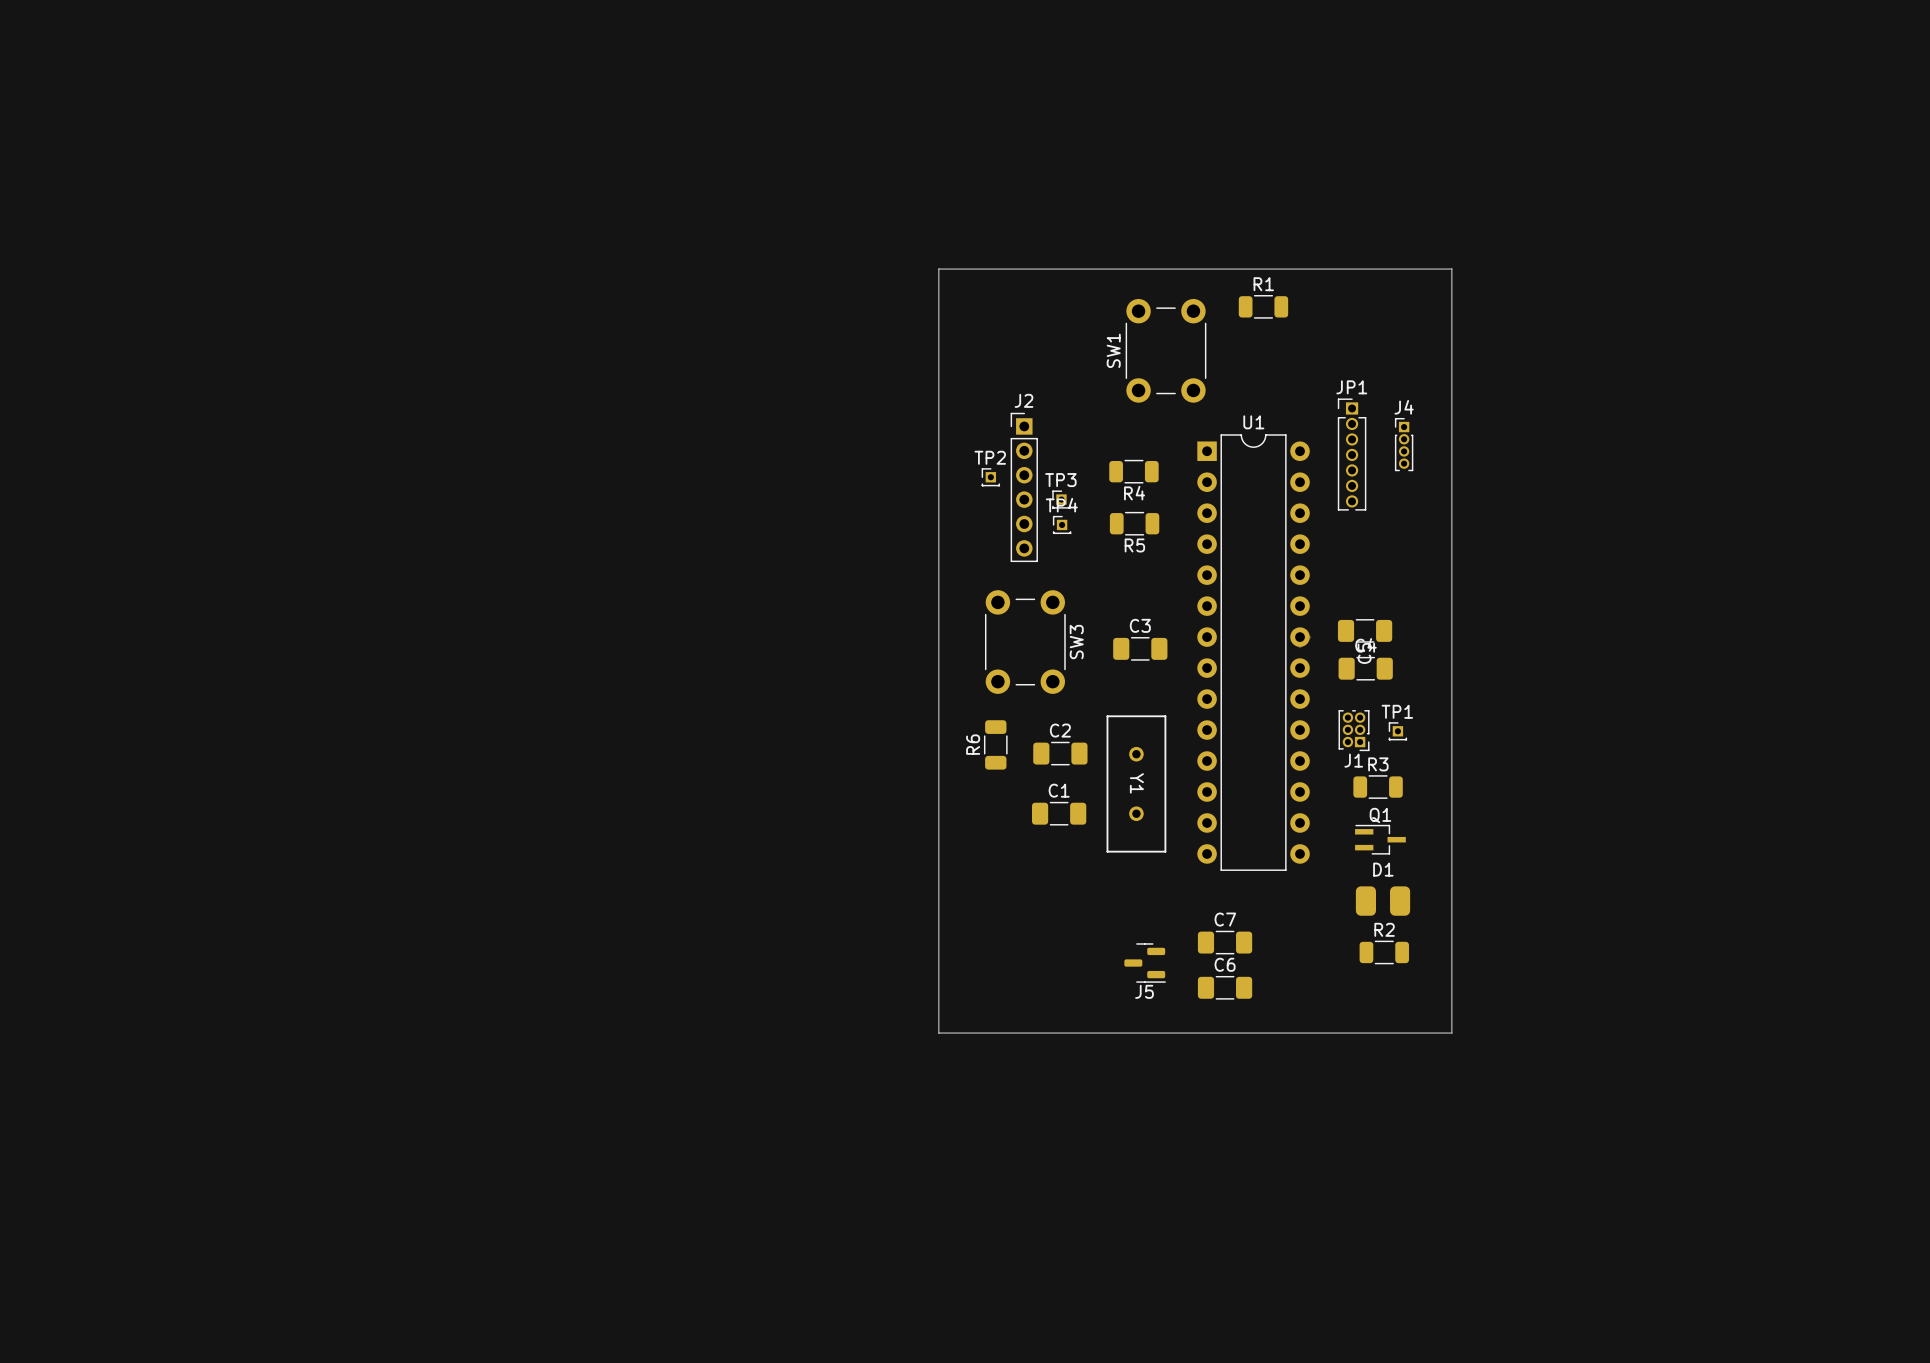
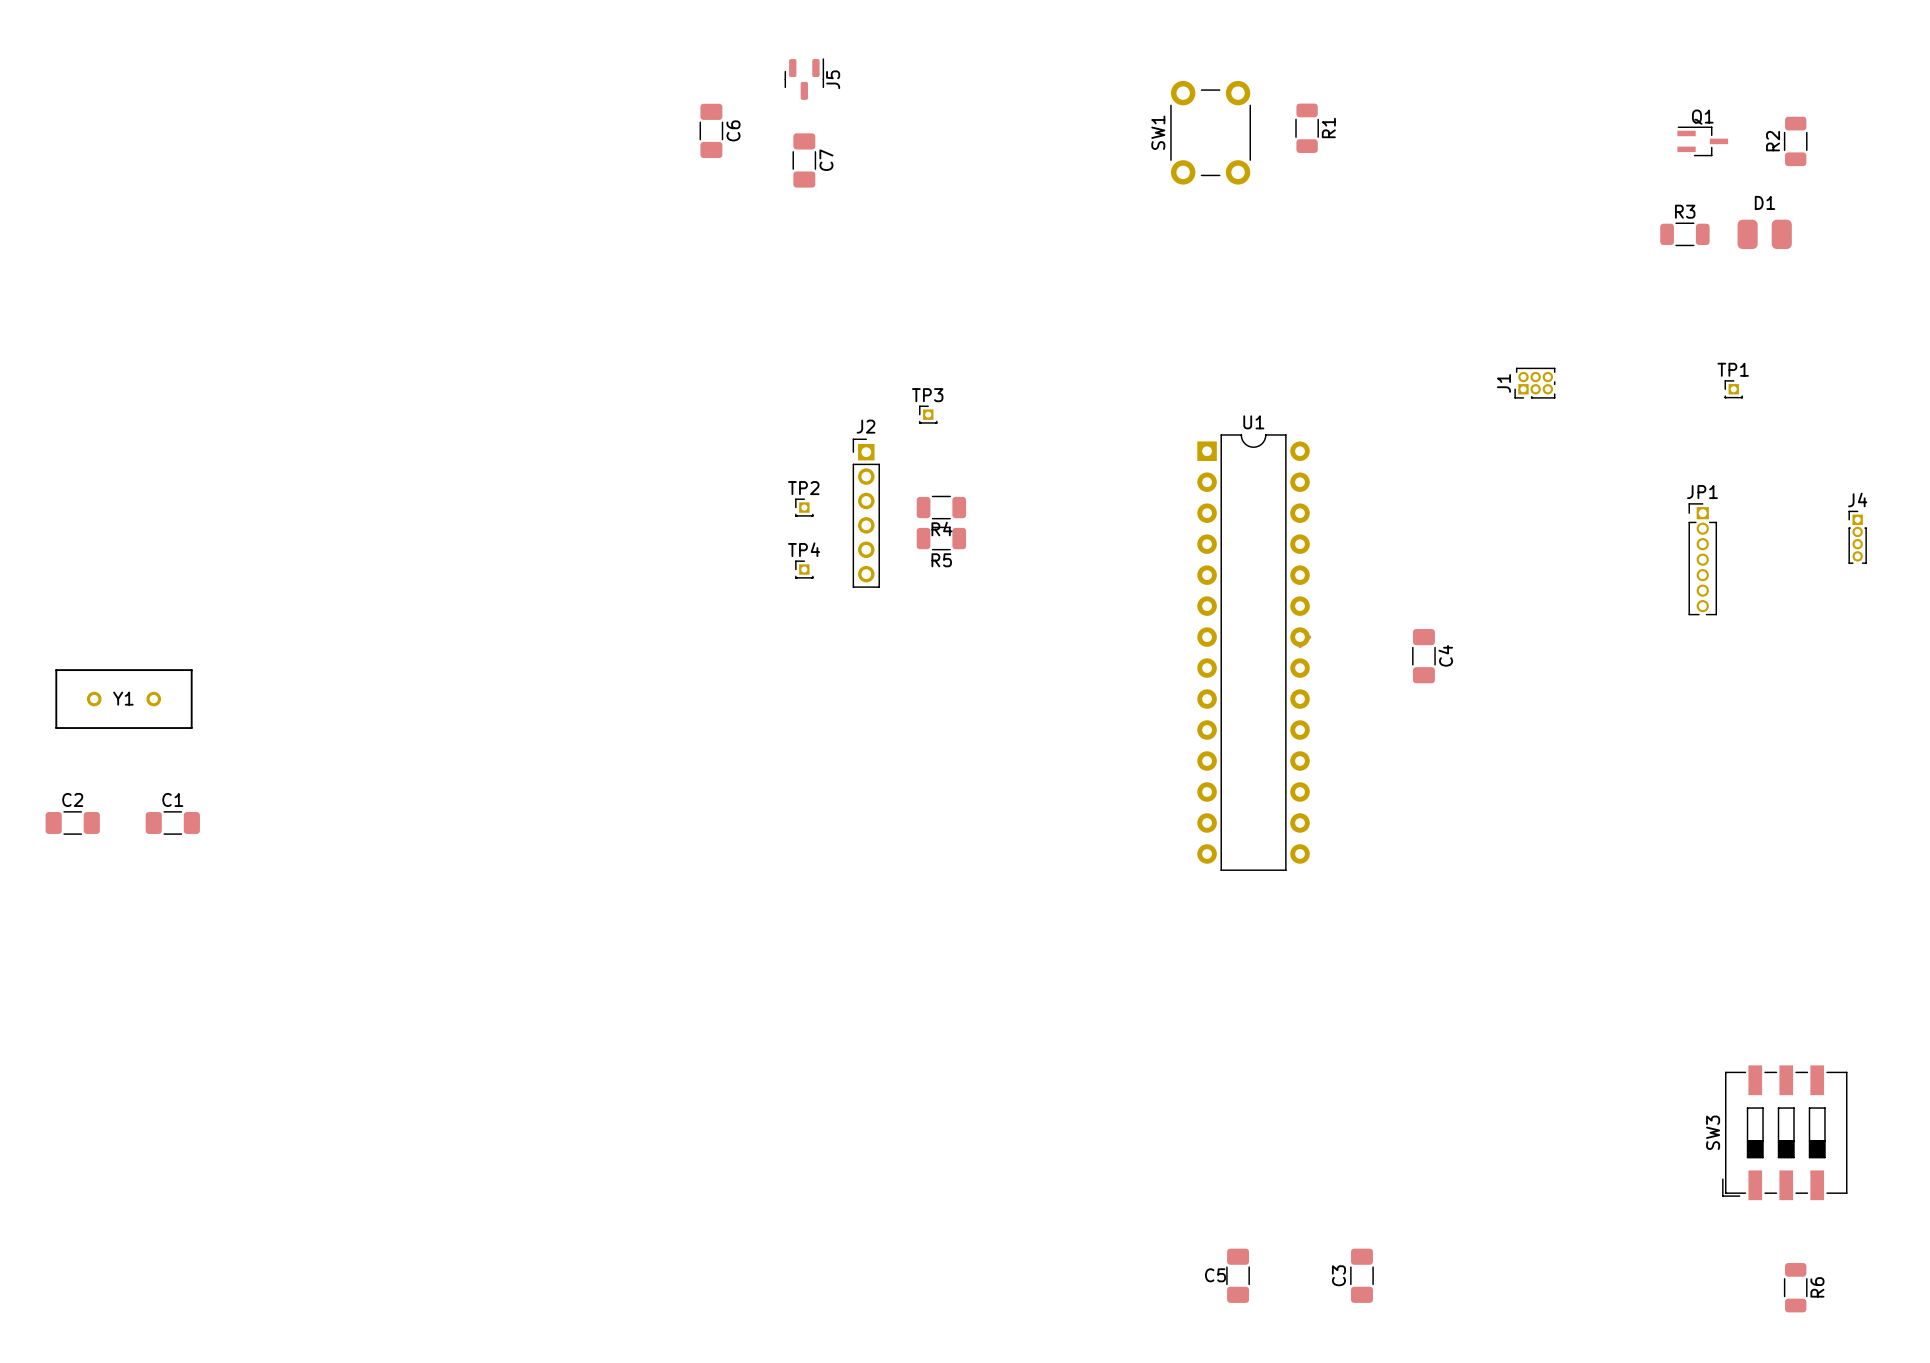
board edge: (938, 269) (1451, 269) (1451, 1033) (938, 1033) (938, 269) -> none
R1 rotation: 0° (1263, 306) -> 90° clockwise (1307, 128)
R1 position: (1263, 306) -> (1307, 128)
SW1 position: (1166, 350) -> (1210, 132)
J4 position: (1404, 444) -> (1857, 537)
JP1 position: (1352, 454) -> (1702, 559)
R4 position: (1133, 471) -> (941, 507)
TP2 position: (990, 477) -> (804, 507)
J2 position: (1024, 487) -> (866, 513)
TP3 position: (1061, 499) -> (928, 414)
R5 position: (1134, 523) -> (941, 538)
TP4 position: (1062, 524) -> (804, 569)
SW3 footprint: [984, 590, 1066, 694] -> [1722, 1065, 1848, 1201]
C3 name position: C3 (1140, 625) -> C3 (1338, 1275)
C5 rotation: 0° (1365, 630) -> 90° clockwise (1238, 1275)
C5 position: (1365, 630) -> (1238, 1275)
SW3 name position: SW3 (1076, 642) -> SW3 (1713, 1132)
C3 rotation: 0° (1140, 648) -> 90° clockwise (1361, 1275)
C3 position: (1140, 648) -> (1361, 1275)
C4 rotation: 0° (1365, 668) -> 90° clockwise (1423, 656)
C4 position: (1365, 668) -> (1423, 656)
J1 rotation: 0° (1354, 730) -> 90° clockwise (1534, 383)
J1 position: (1354, 730) -> (1534, 383)
TP1 position: (1397, 731) -> (1733, 389)
R6 name position: R6 (973, 744) -> R6 (1817, 1287)
R6 position: (995, 744) -> (1795, 1287)
C2 position: (1060, 753) -> (72, 822)
Y1 rotation: 0° (1136, 783) -> 90° clockwise (123, 699)
Y1 position: (1136, 783) -> (123, 699)
R3 position: (1378, 787) -> (1684, 234)
C1 position: (1059, 813) -> (172, 822)
Q1 position: (1380, 839) -> (1702, 141)
D1 position: (1383, 901) -> (1764, 234)
R2 name position: R2 (1384, 929) -> R2 (1773, 141)
C7 rotation: 0° (1225, 942) -> 90° clockwise (804, 160)
C7 position: (1225, 942) -> (804, 160)
R2 rotation: 0° (1384, 952) -> 90° clockwise (1795, 141)
R2 position: (1384, 952) -> (1795, 141)
J5 rotation: 0° (1145, 963) -> 90° counterclockwise (804, 79)
J5 position: (1145, 963) -> (804, 79)
C6 rotation: 0° (1225, 987) -> 90° clockwise (711, 130)
C6 position: (1225, 987) -> (711, 130)

